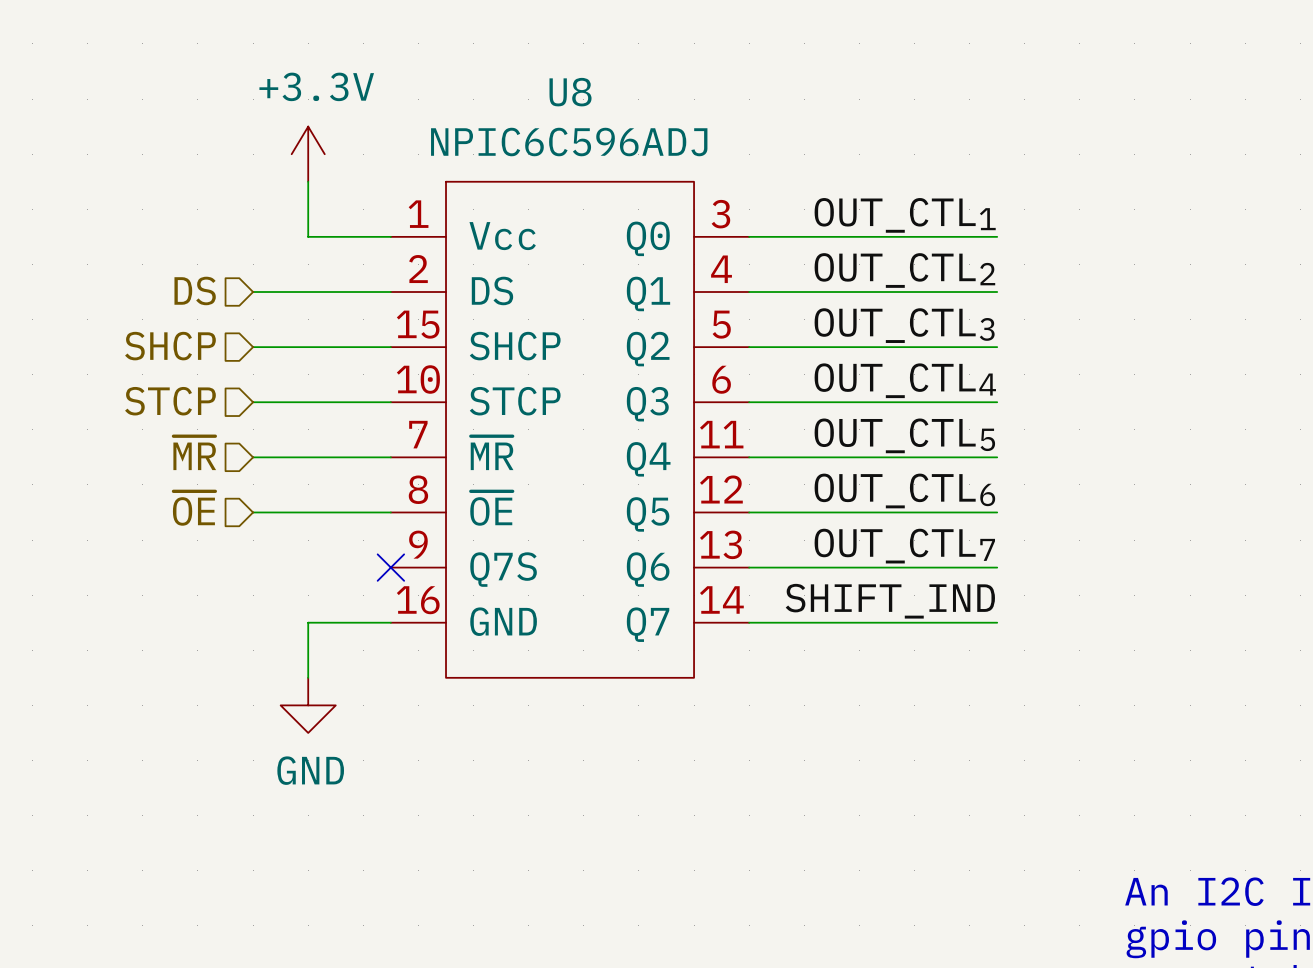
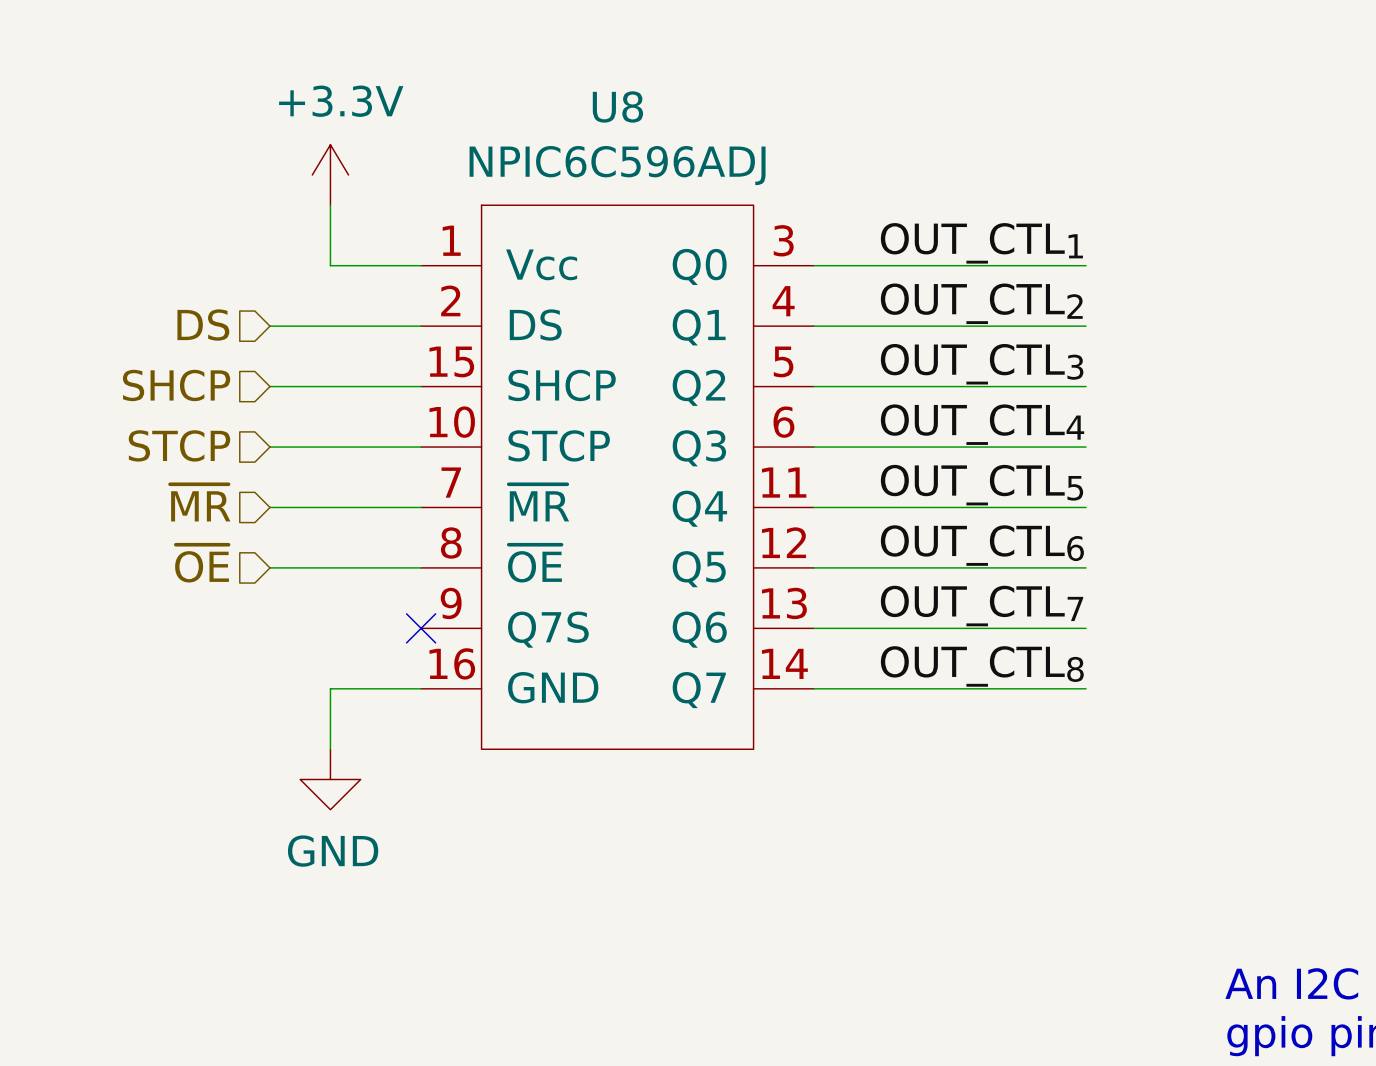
label: SHIFT_IND (890, 601) -> OUT_CTL8 (982, 666)

